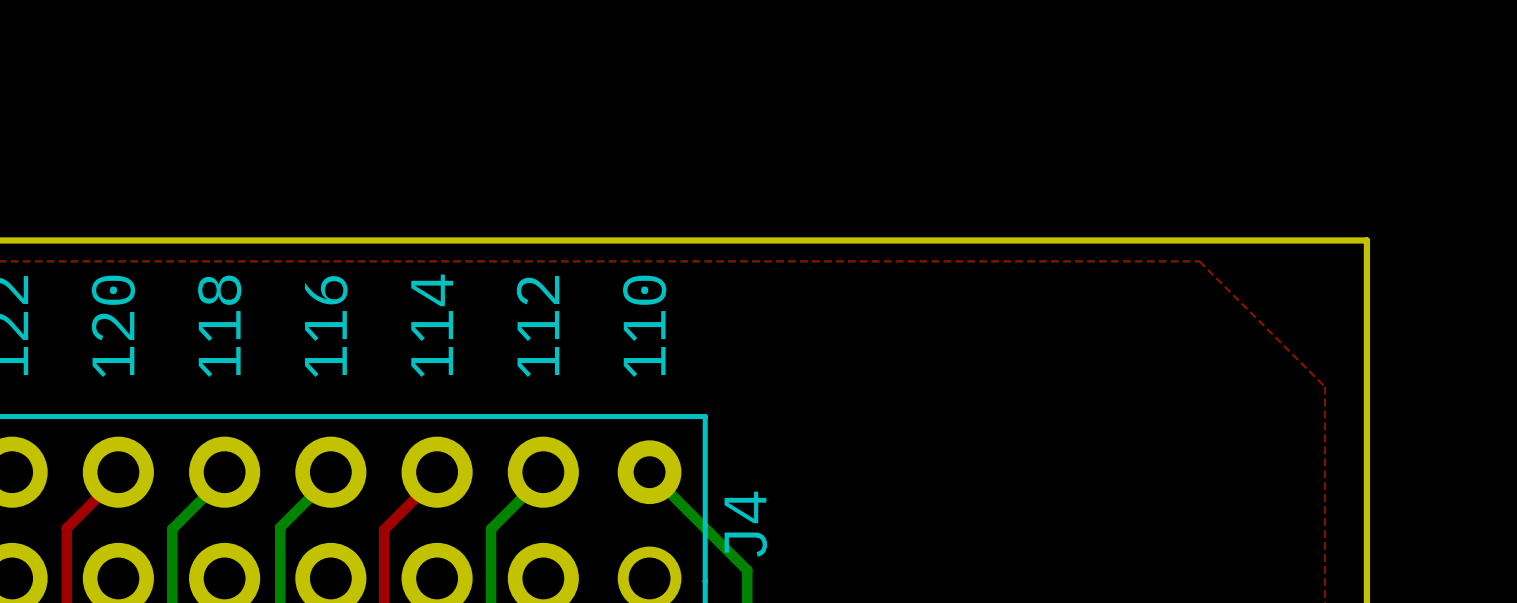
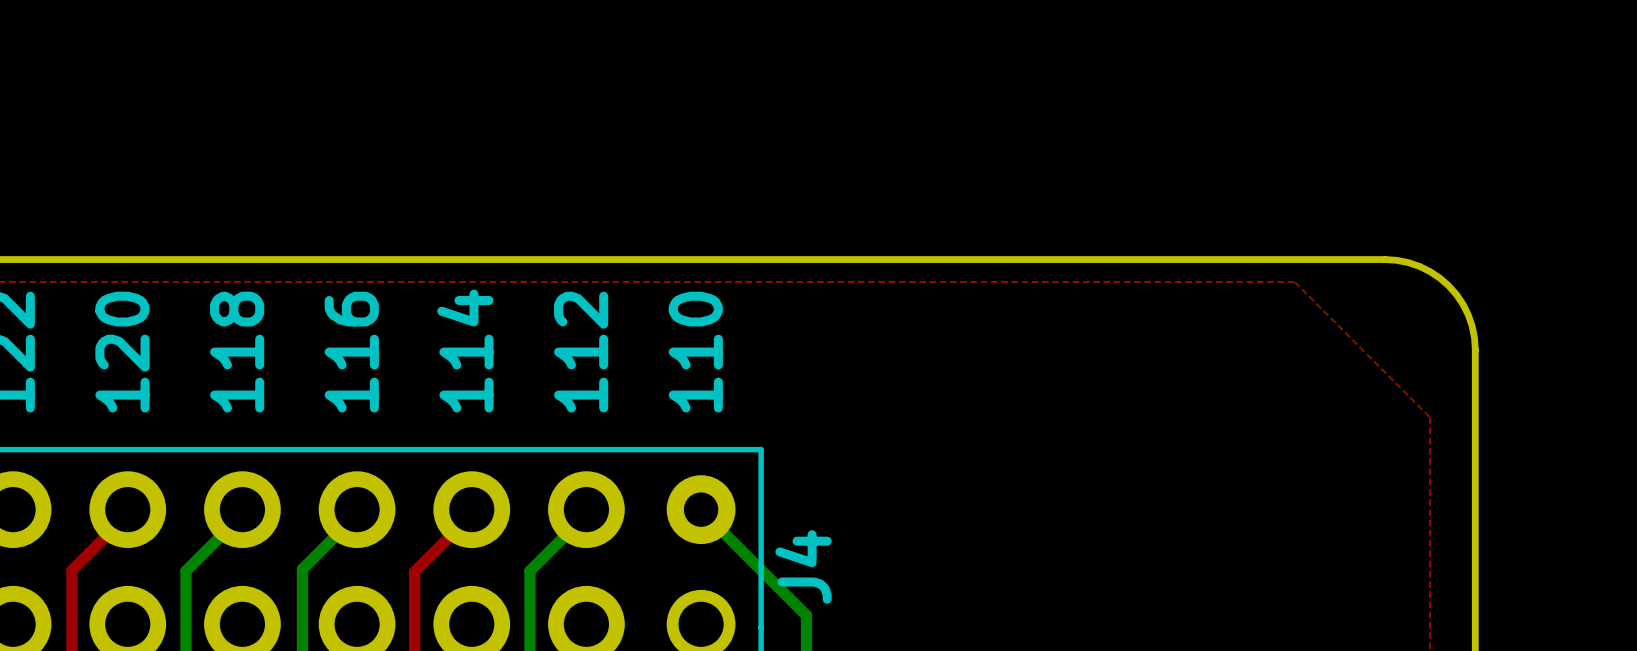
board edge: (1283, 240) (1366, 240) (1366, 324) -> (1385, 259) (1408, 262) (1419, 266) (1439, 278) (1448, 285) (1456, 294) (1468, 315) (1474, 338) (1475, 349)

